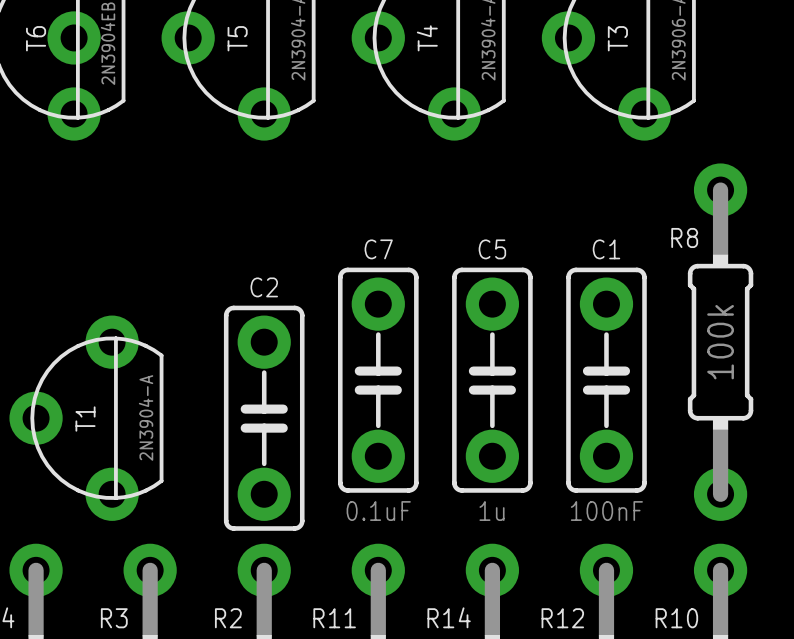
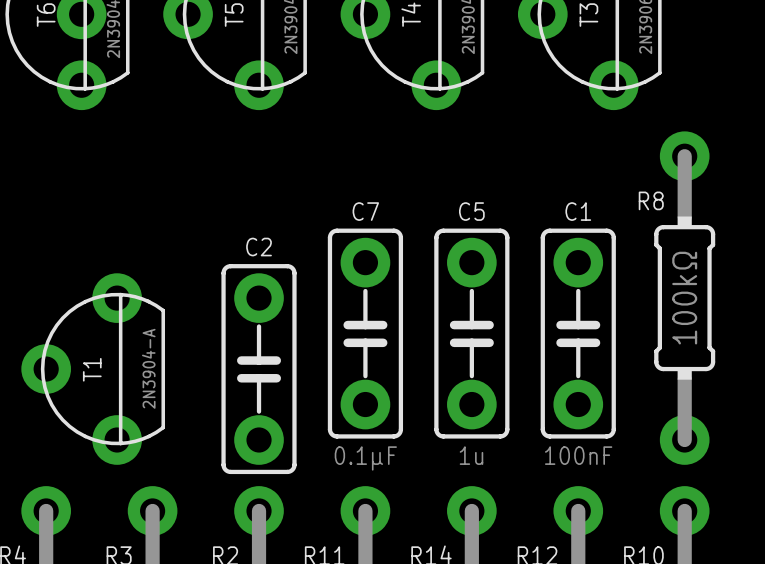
R8 value: 100k (720, 342) -> 100kΩ (684, 298)
C7 value: 0.1uF (378, 511) -> 0.1μF (365, 458)

